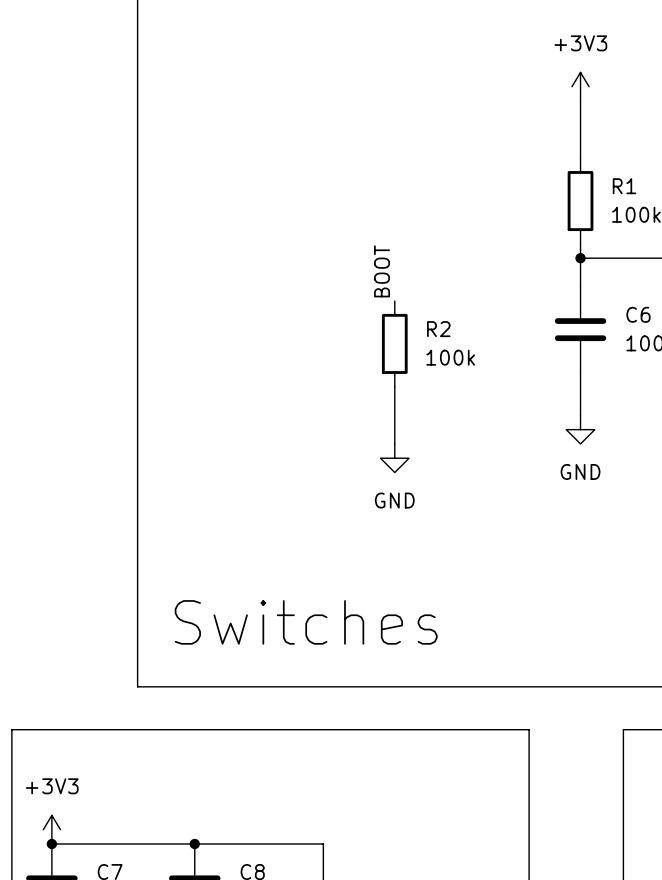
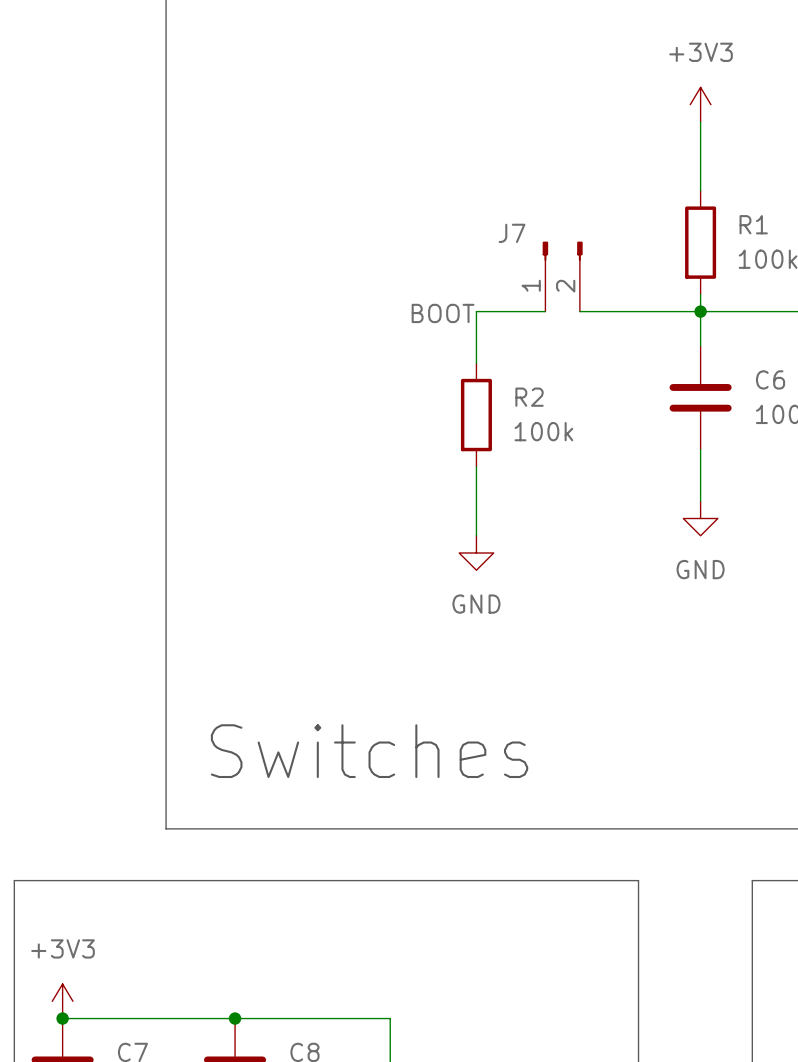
J7: none -> (562, 276)
wire: none -> (545, 311) (476, 311) (476, 363)
wire: none -> (579, 311) (700, 311)
label rotation: 0° (382, 271) -> 90° clockwise (443, 313)

